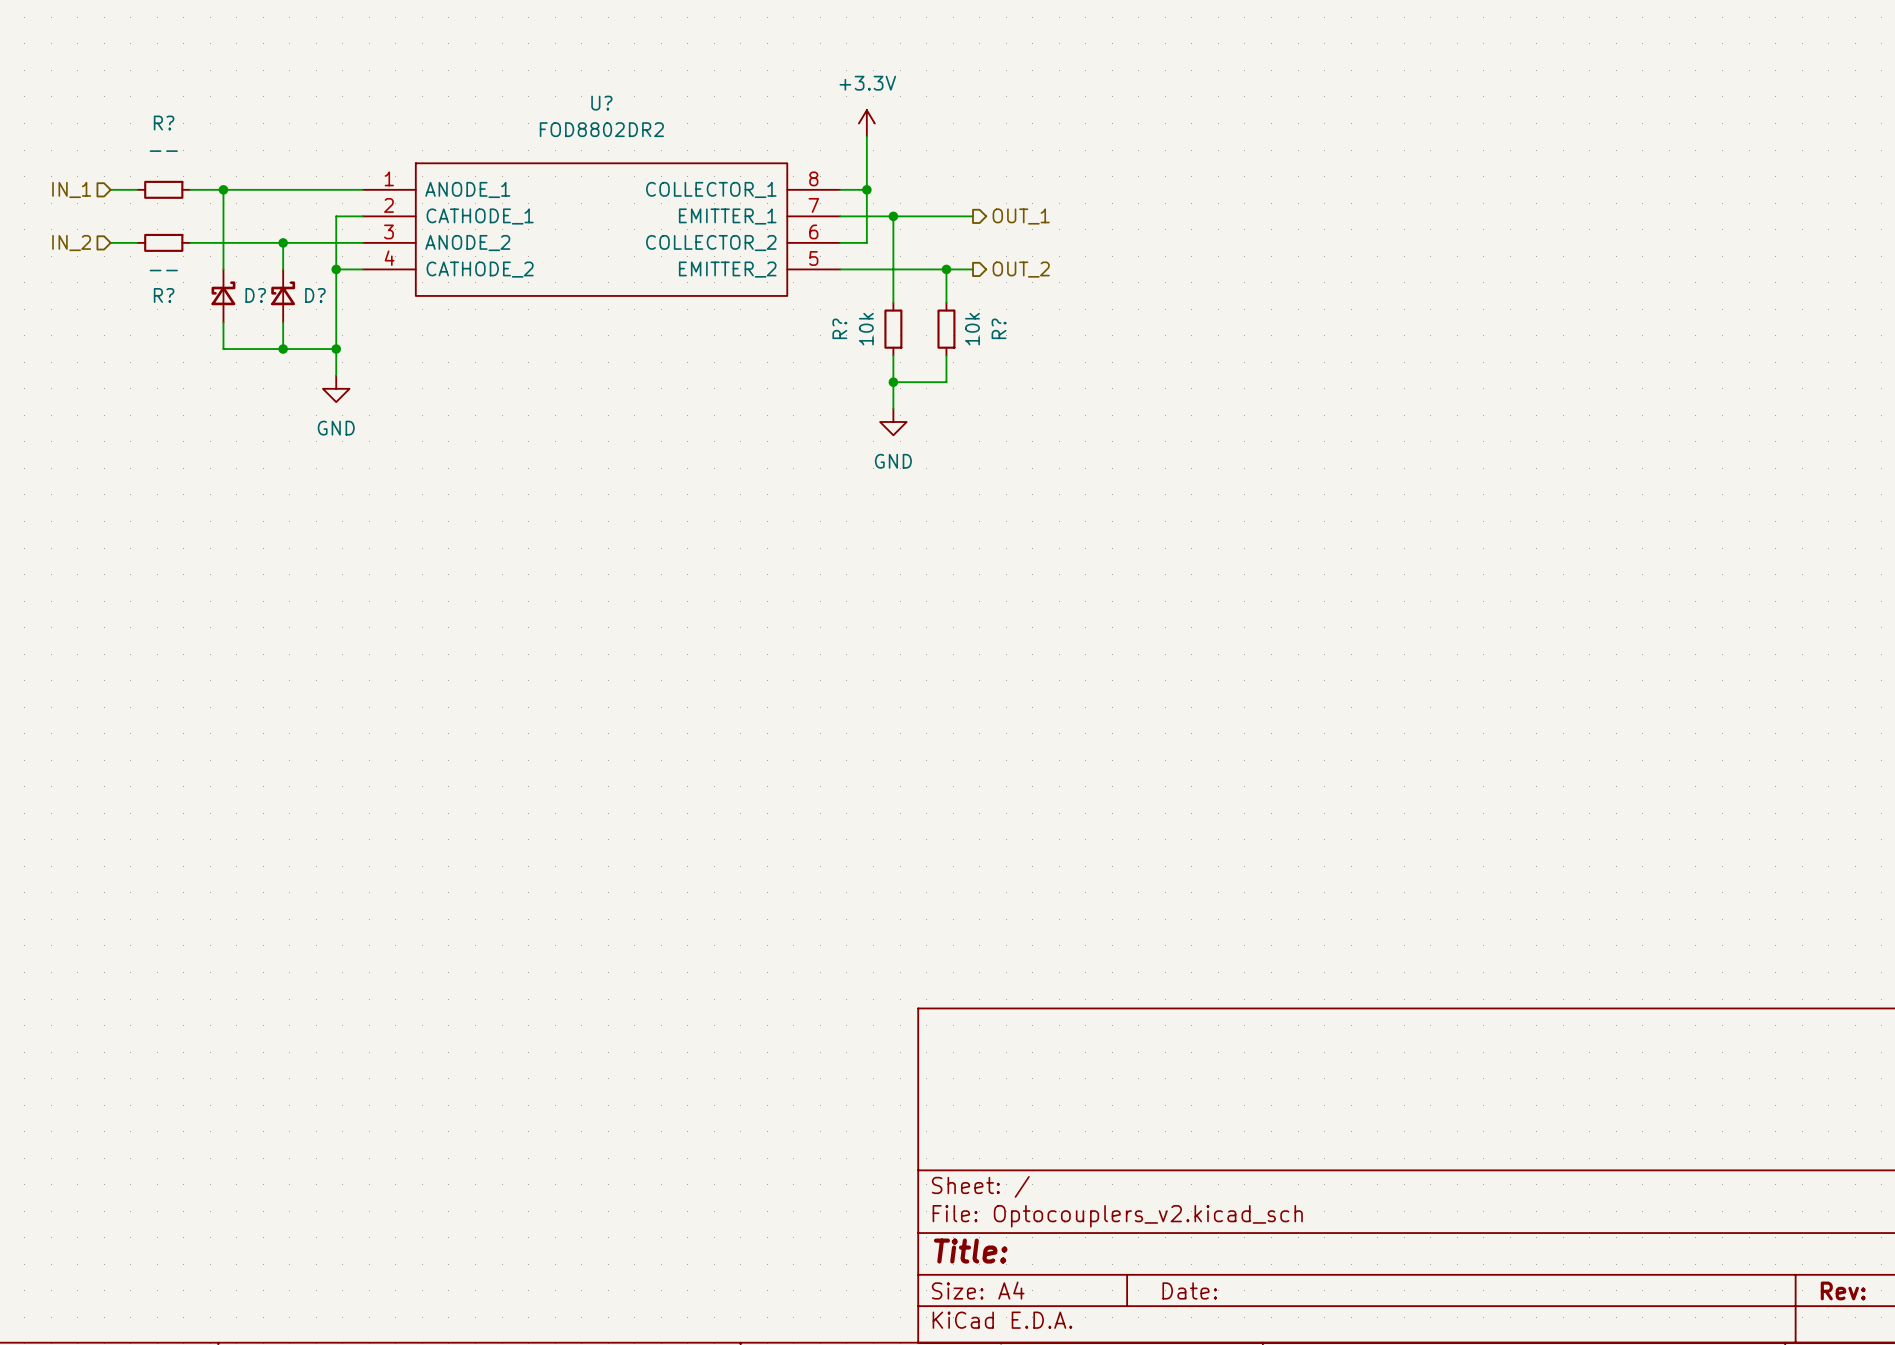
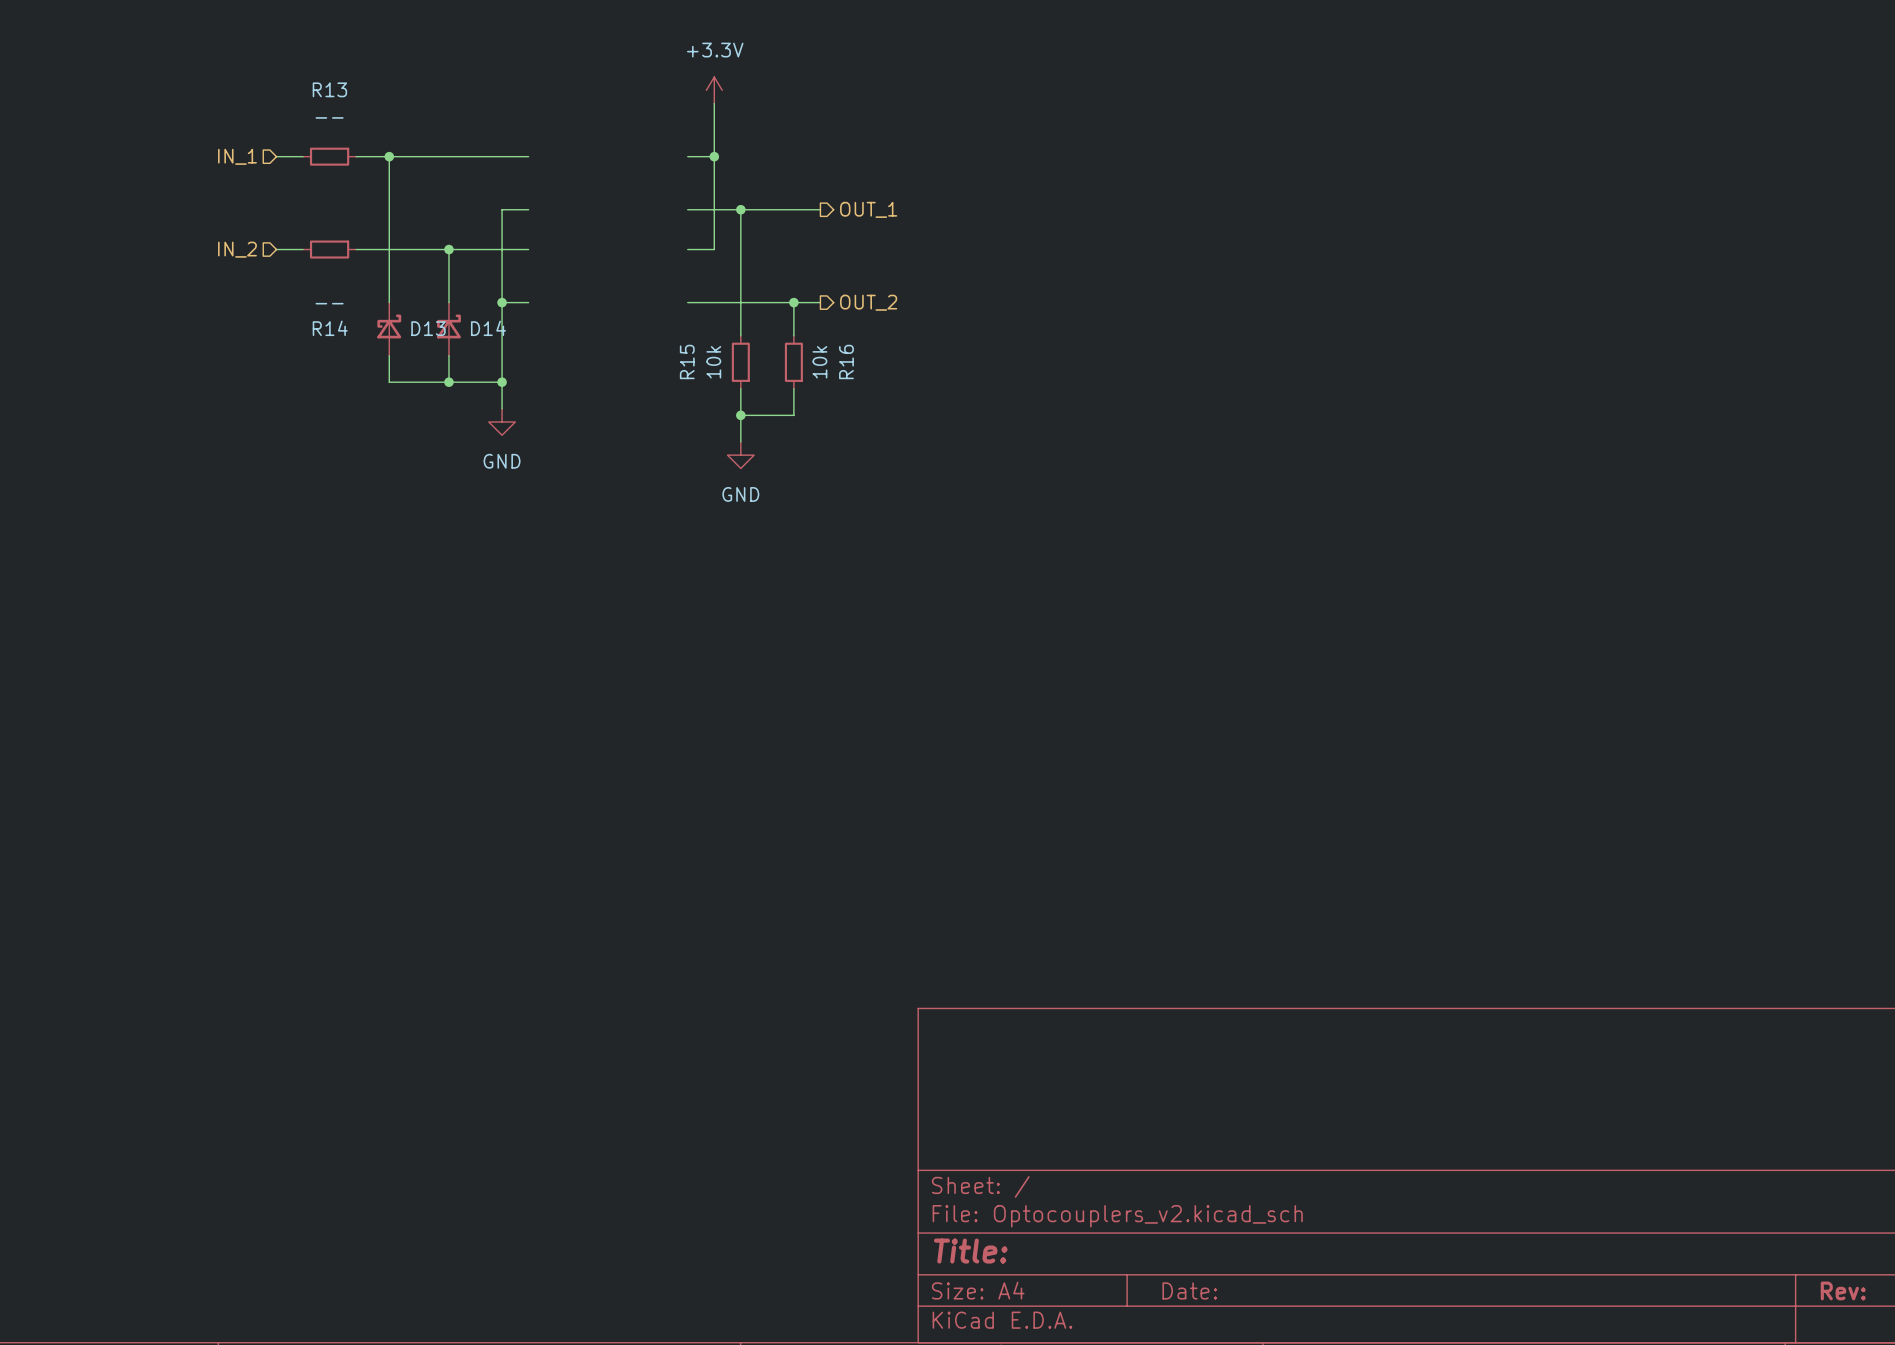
wire: none -> (714, 103) (714, 249) (687, 249)
power symbol position: +3.3V (866, 123) -> +3.3V (714, 90)
wire: (866, 136) (866, 242) (840, 242) -> none
R13: none -> -- (329, 156)
wire: none -> (389, 156) (389, 302)
junction: none -> (389, 156)
junction: none -> (714, 156)
hierarchical label position: IN_1 (71, 189) -> IN_1 (237, 156)
wire: (110, 189) (137, 189) -> (276, 156) (303, 156)
R?: -- (163, 189) -> none
wire: (190, 189) (362, 189) -> (356, 156) (528, 156)
wire: (223, 189) (223, 269) -> none
junction: (223, 189) -> none
wire: (840, 189) (866, 189) -> (687, 156) (714, 156)
junction: (866, 189) -> none
wire: none -> (528, 209) (502, 209) (502, 408)
wire: none -> (740, 209) (740, 335)
junction: none -> (740, 209)
wire: (362, 216) (336, 216) (336, 375) -> none
wire: (840, 216) (972, 216) -> (687, 209) (820, 209)
wire: (893, 216) (893, 302) -> none
junction: (893, 216) -> none
hierarchical label position: OUT_1 (1021, 216) -> OUT_1 (868, 209)
U?: FOD8802DR2 (601, 229) -> none
wire: (110, 242) (137, 242) -> (276, 249) (303, 249)
R?: -- (163, 242) -> none
wire: (190, 242) (362, 242) -> (356, 249) (528, 249)
wire: (283, 242) (283, 269) -> none
junction: (283, 242) -> none
hierarchical label position: IN_2 (71, 243) -> IN_2 (237, 249)
R14: none -> -- (329, 249)
wire: none -> (448, 249) (448, 302)
junction: none -> (448, 249)
wire: (336, 269) (362, 269) -> (502, 302) (528, 302)
junction: (336, 269) -> none
wire: (840, 269) (972, 269) -> (687, 302) (820, 302)
wire: (946, 269) (946, 302) -> (793, 302) (793, 335)
junction: (946, 269) -> none
hierarchical label position: OUT_2 (1021, 269) -> OUT_2 (868, 302)
D?: (223, 295) -> none
D?: (283, 295) -> none
junction: none -> (502, 302)
junction: none -> (793, 302)
wire: (223, 322) (223, 349) (336, 349) -> (389, 355) (389, 382) (502, 382)
wire: (283, 322) (283, 349) -> (448, 355) (448, 382)
D13: none -> (389, 329)
D14: none -> (448, 329)
R?: 10k (893, 329) -> none
R?: 10k (946, 329) -> none
junction: (283, 349) -> none
junction: (336, 349) -> none
wire: (893, 355) (893, 408) -> (740, 388) (740, 441)
wire: (946, 355) (946, 382) (893, 382) -> (793, 388) (793, 415) (740, 415)
R15: none -> 10k (740, 362)
R16: none -> 10k (793, 362)
junction: none -> (448, 382)
junction: none -> (502, 382)
junction: (893, 382) -> none
power symbol position: GND (336, 388) -> GND (502, 421)
junction: none -> (740, 415)
power symbol position: GND (893, 421) -> GND (740, 455)

